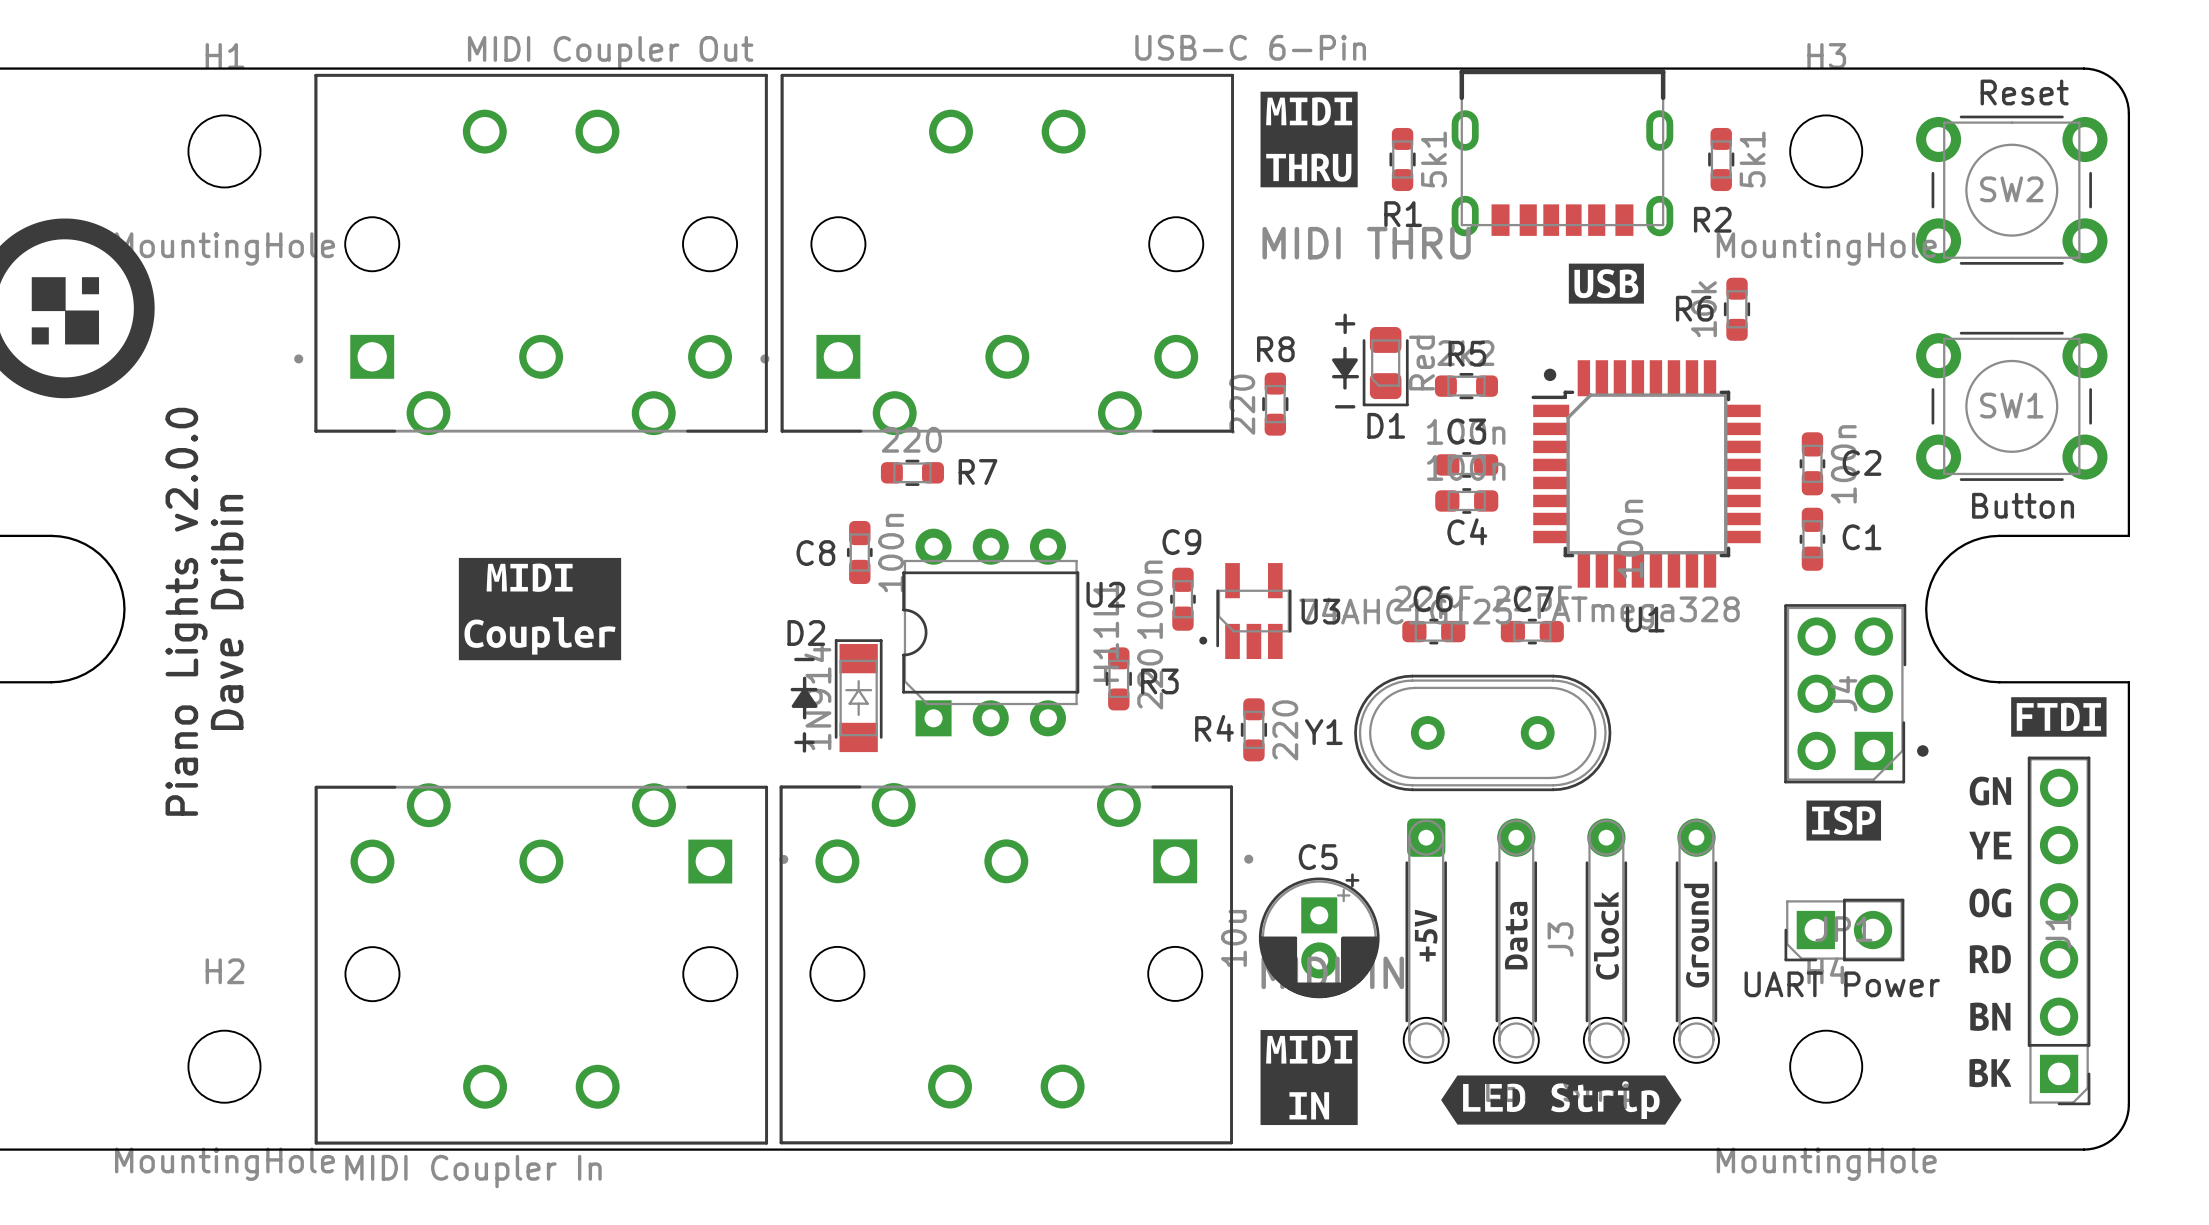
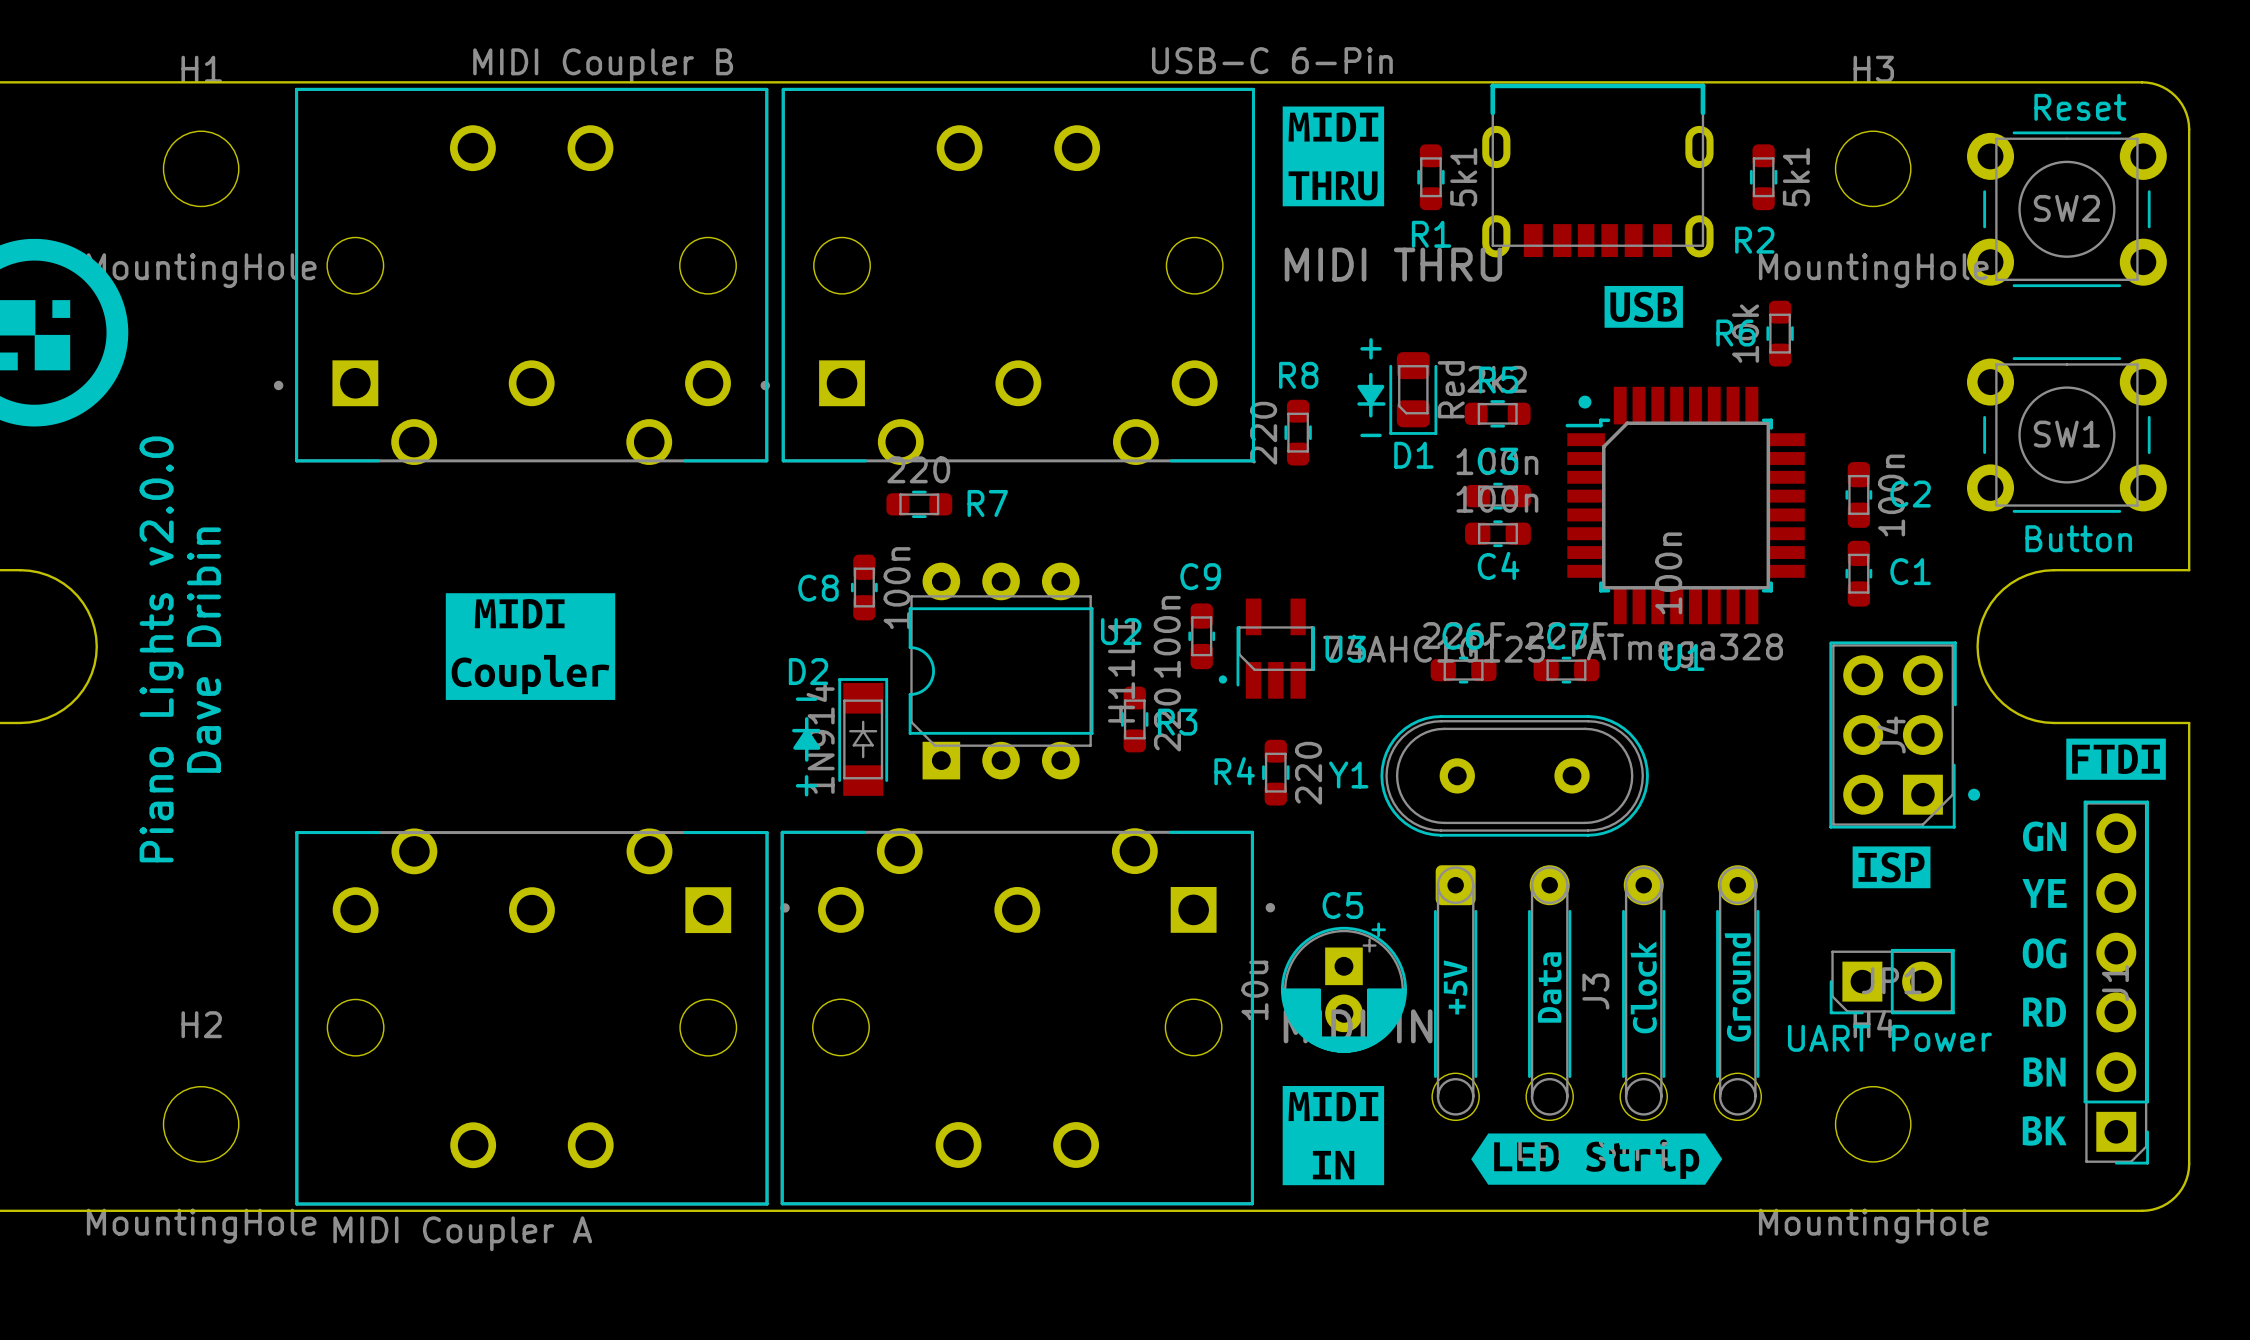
part value: MIDI Coupler Out (610, 52) -> MIDI Coupler B (603, 65)
part value: MIDI Coupler In (473, 1171) -> MIDI Coupler A (462, 1233)

